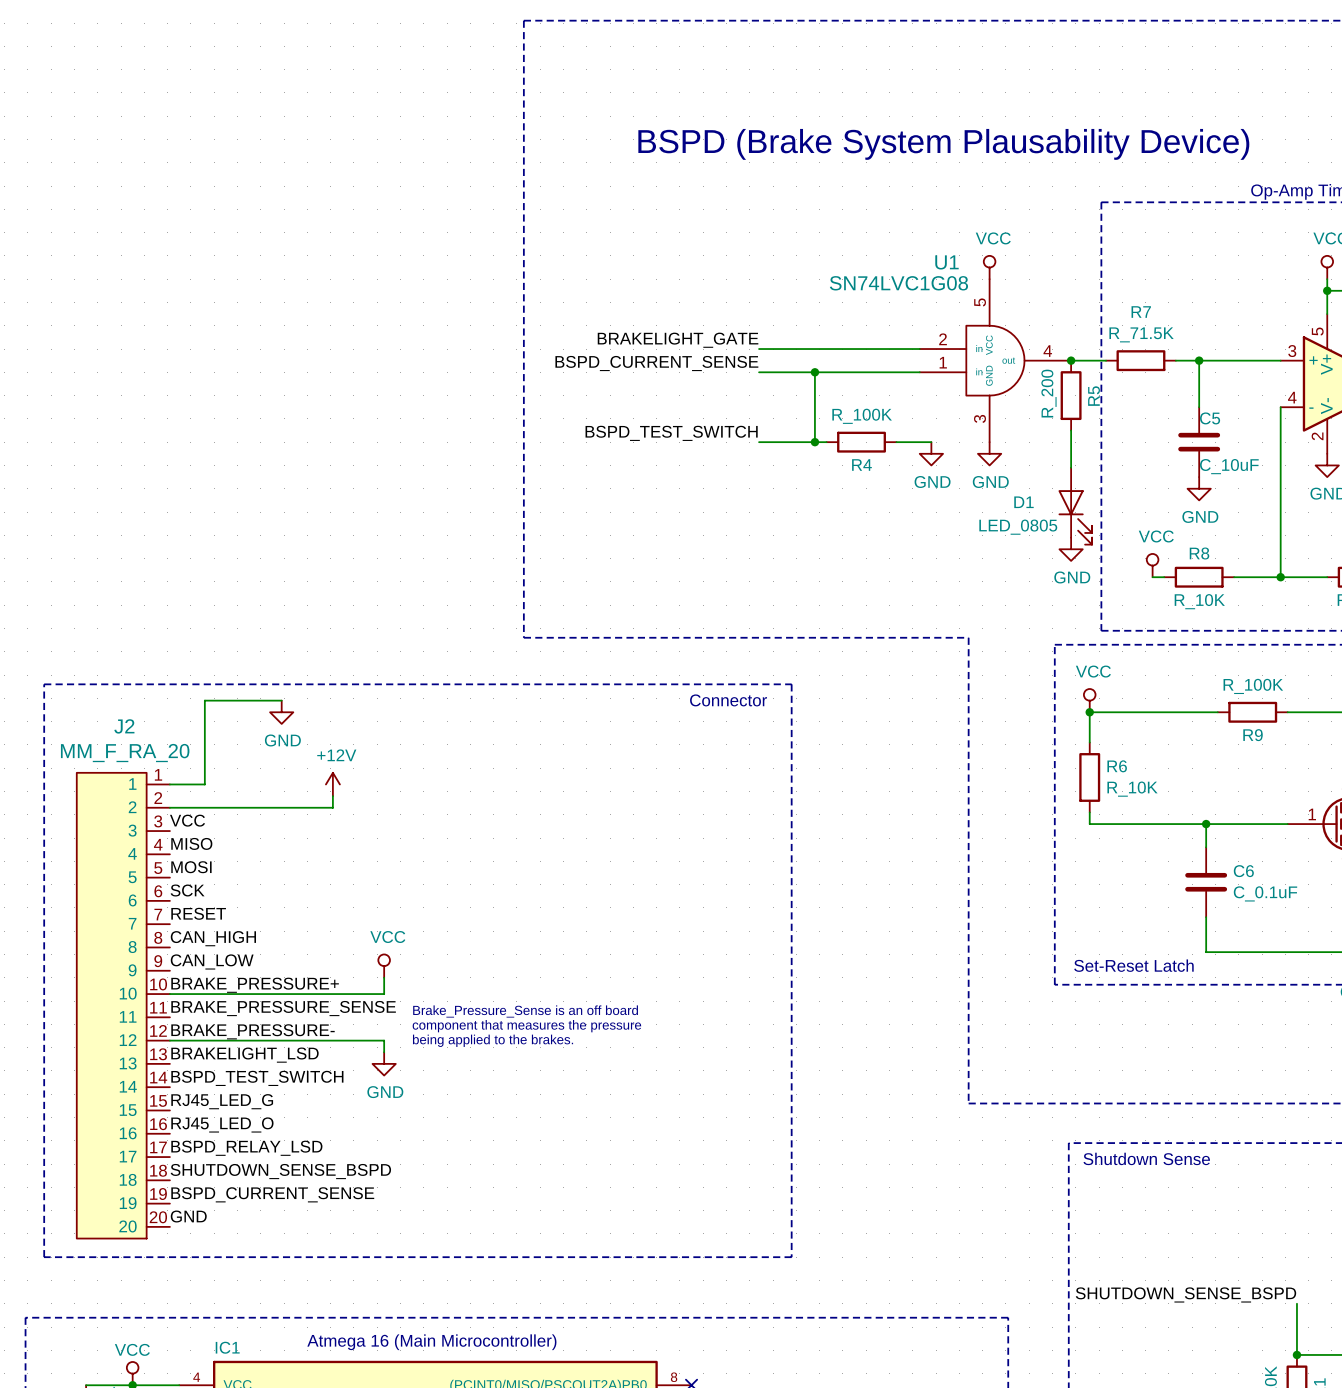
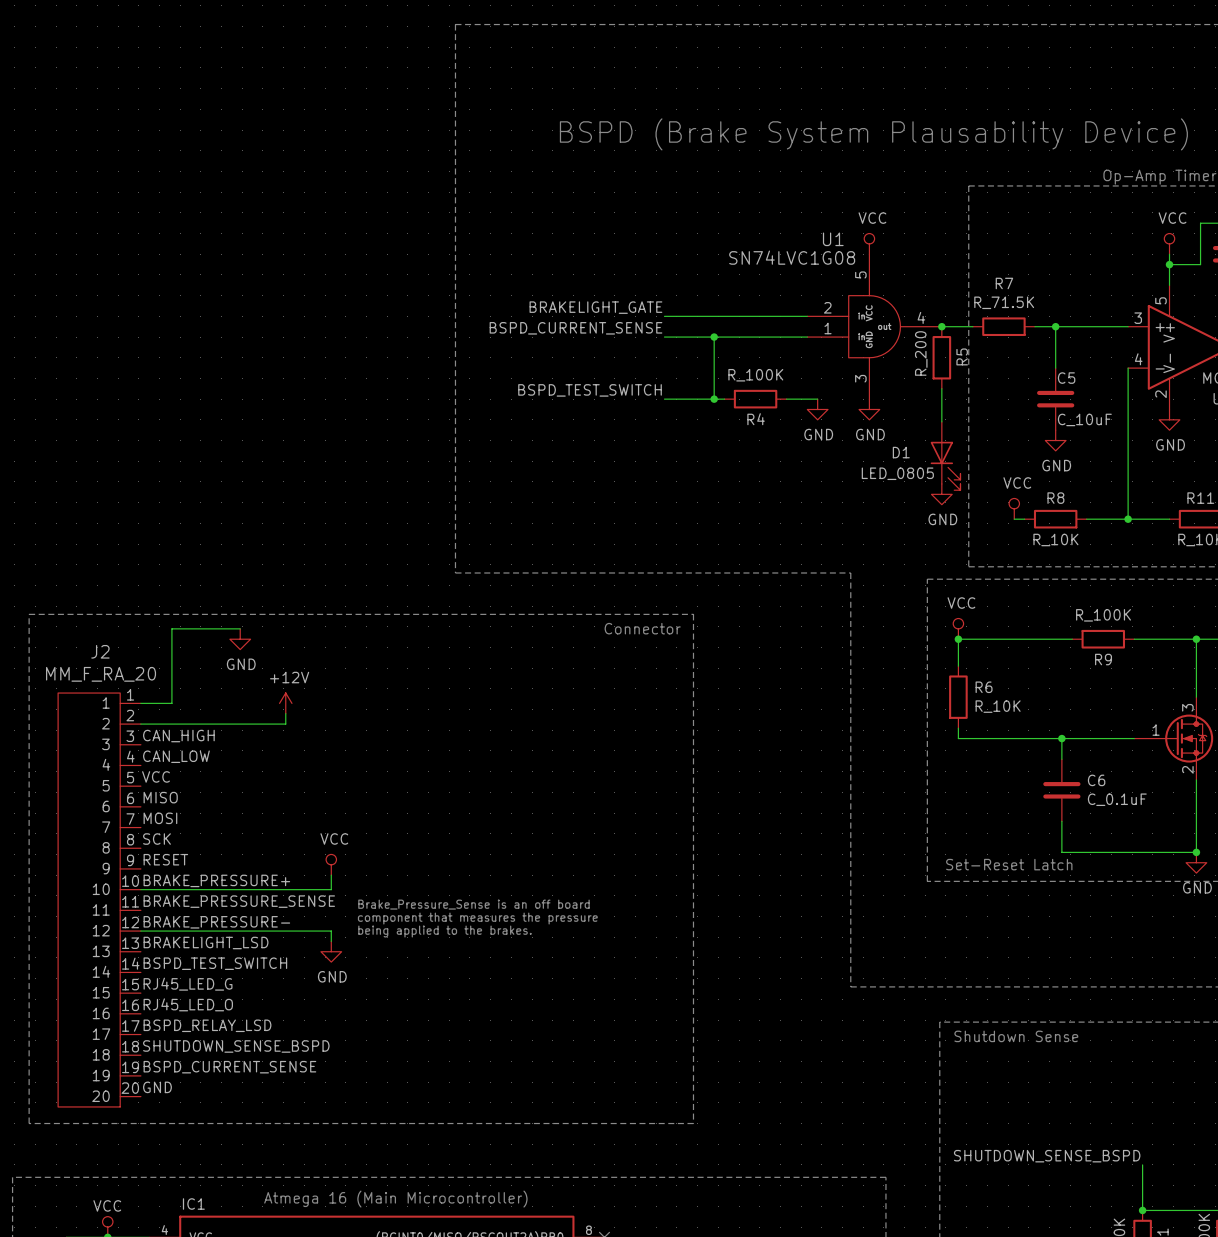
label: VCC (187, 820) -> CAN_HIGH (178, 736)
label: MISO (191, 843) -> CAN_LOW (176, 756)
label: MOSI (191, 867) -> VCC (155, 776)
label: SCK (187, 890) -> MISO (160, 797)
label: RESET (198, 913) -> MOSI (160, 818)
label: CAN_HIGH (213, 938) -> SCK (156, 839)
label: CAN_LOW (212, 961) -> RESET (165, 859)

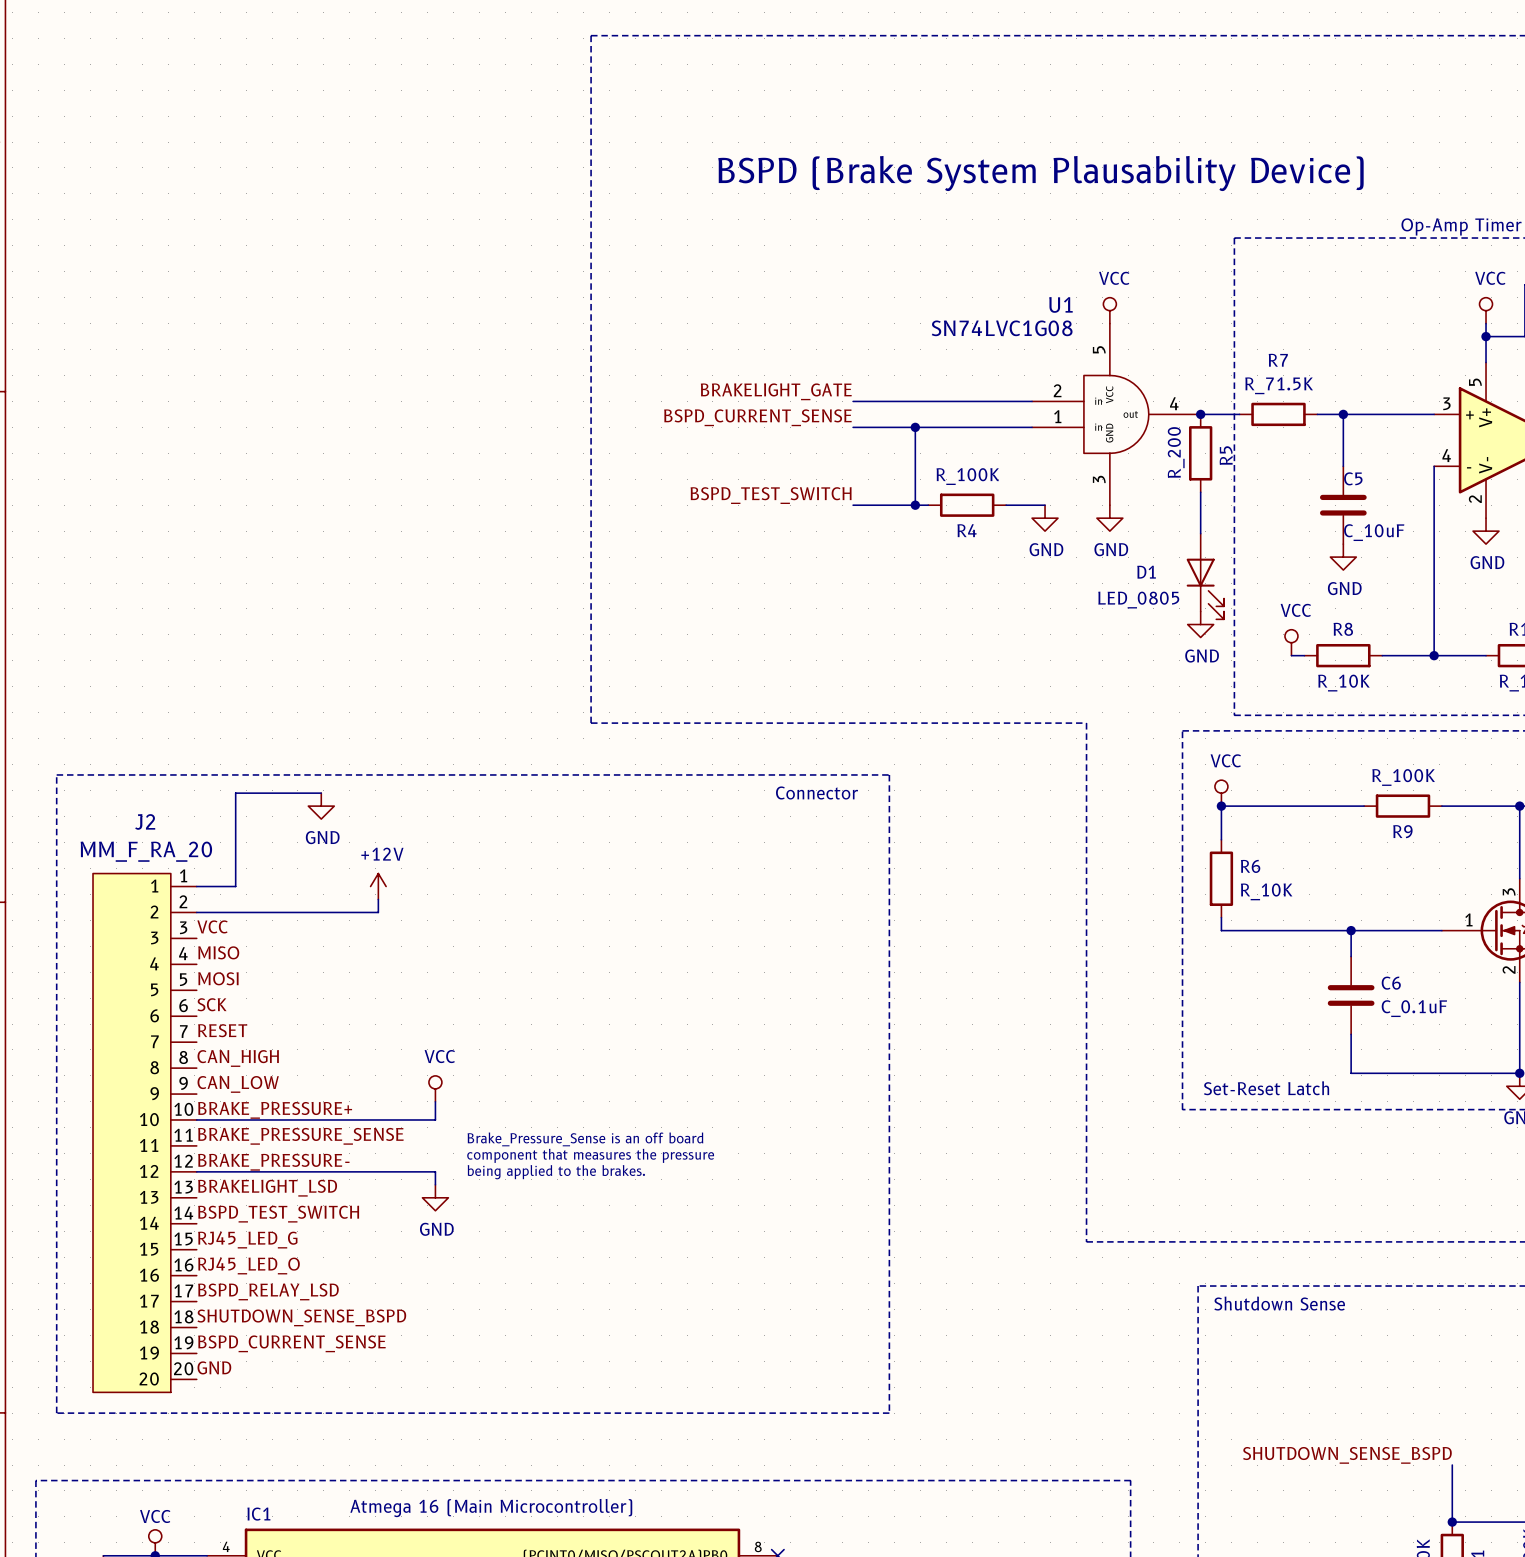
label: CAN_HIGH (178, 736) -> VCC (212, 926)
label: CAN_LOW (176, 756) -> MISO (218, 952)
label: VCC (155, 776) -> MOSI (218, 978)
label: MISO (160, 797) -> SCK (212, 1004)
label: MOSI (160, 818) -> RESET (222, 1030)
label: SCK (156, 839) -> CAN_HIGH (238, 1058)
label: RESET (165, 859) -> CAN_LOW (238, 1084)

